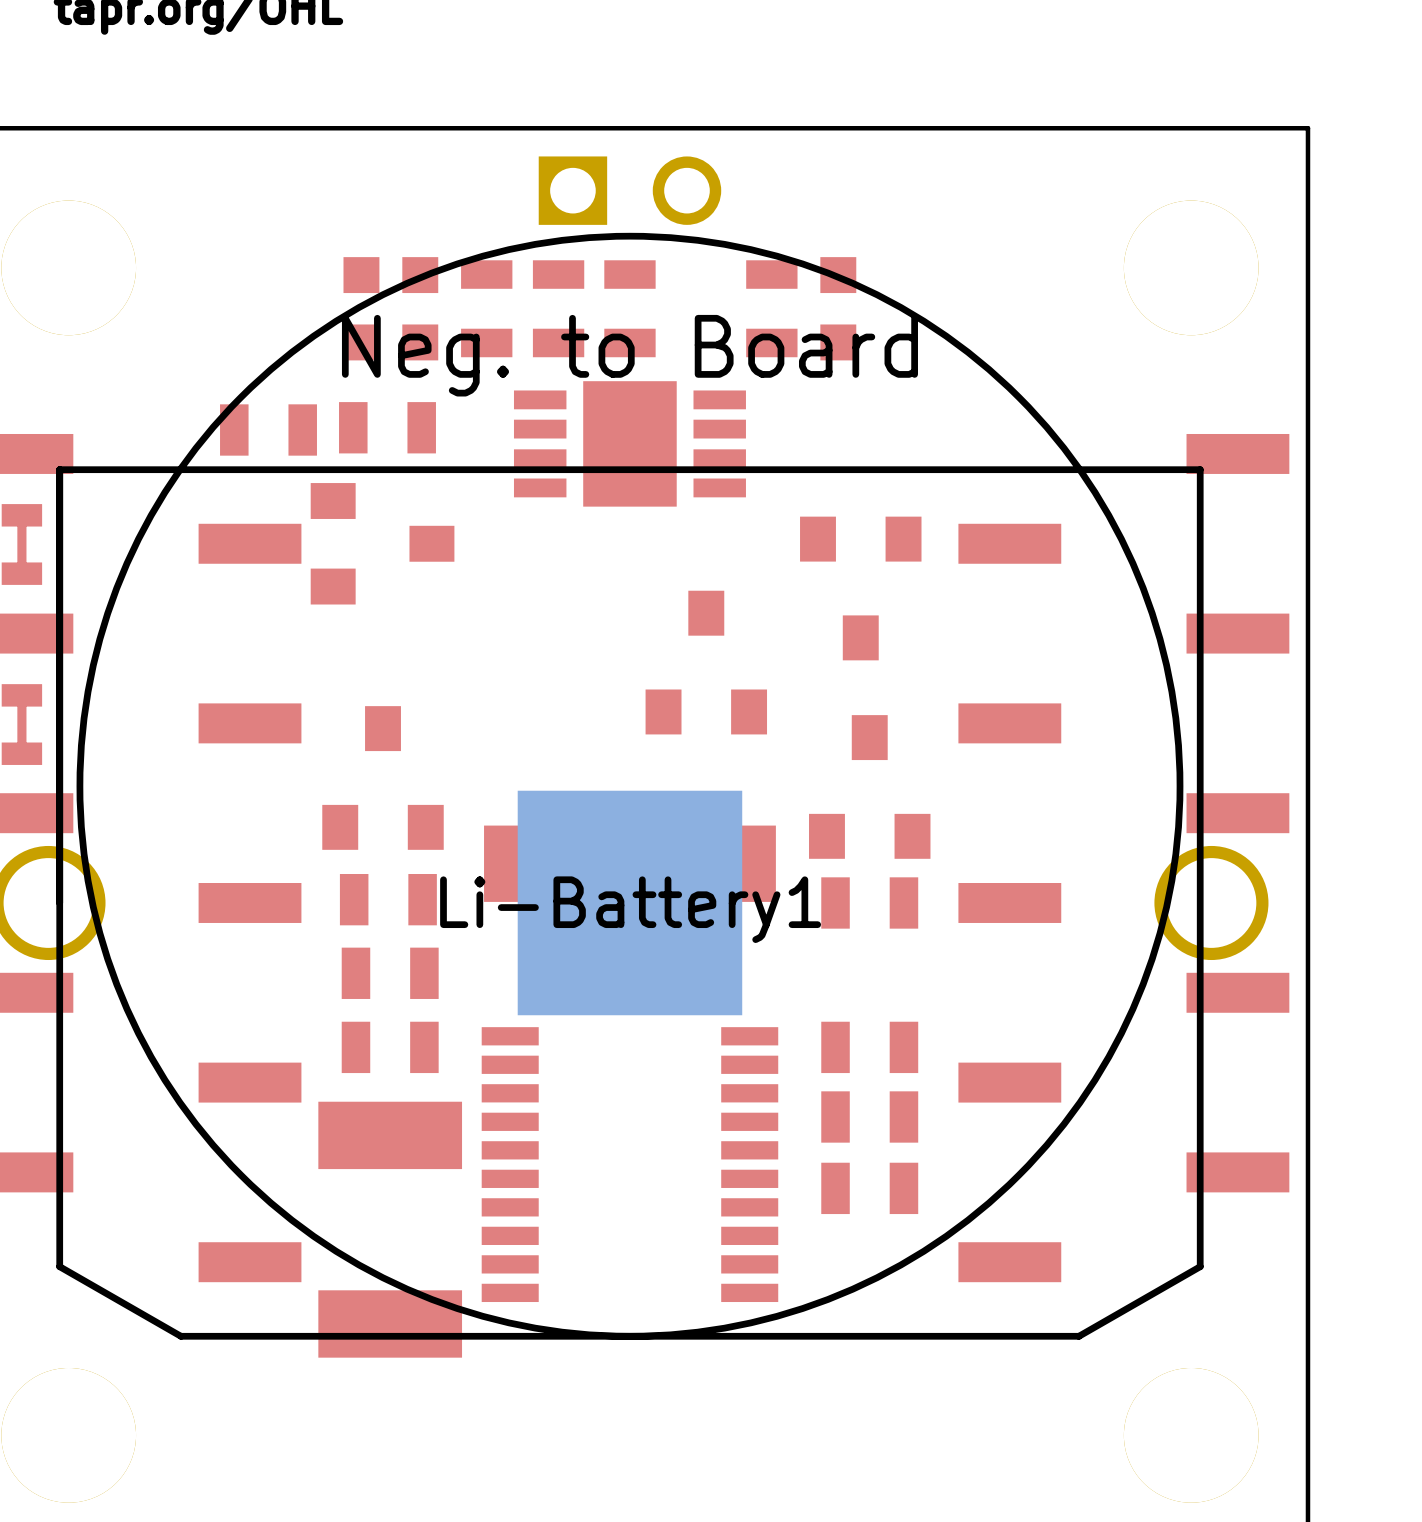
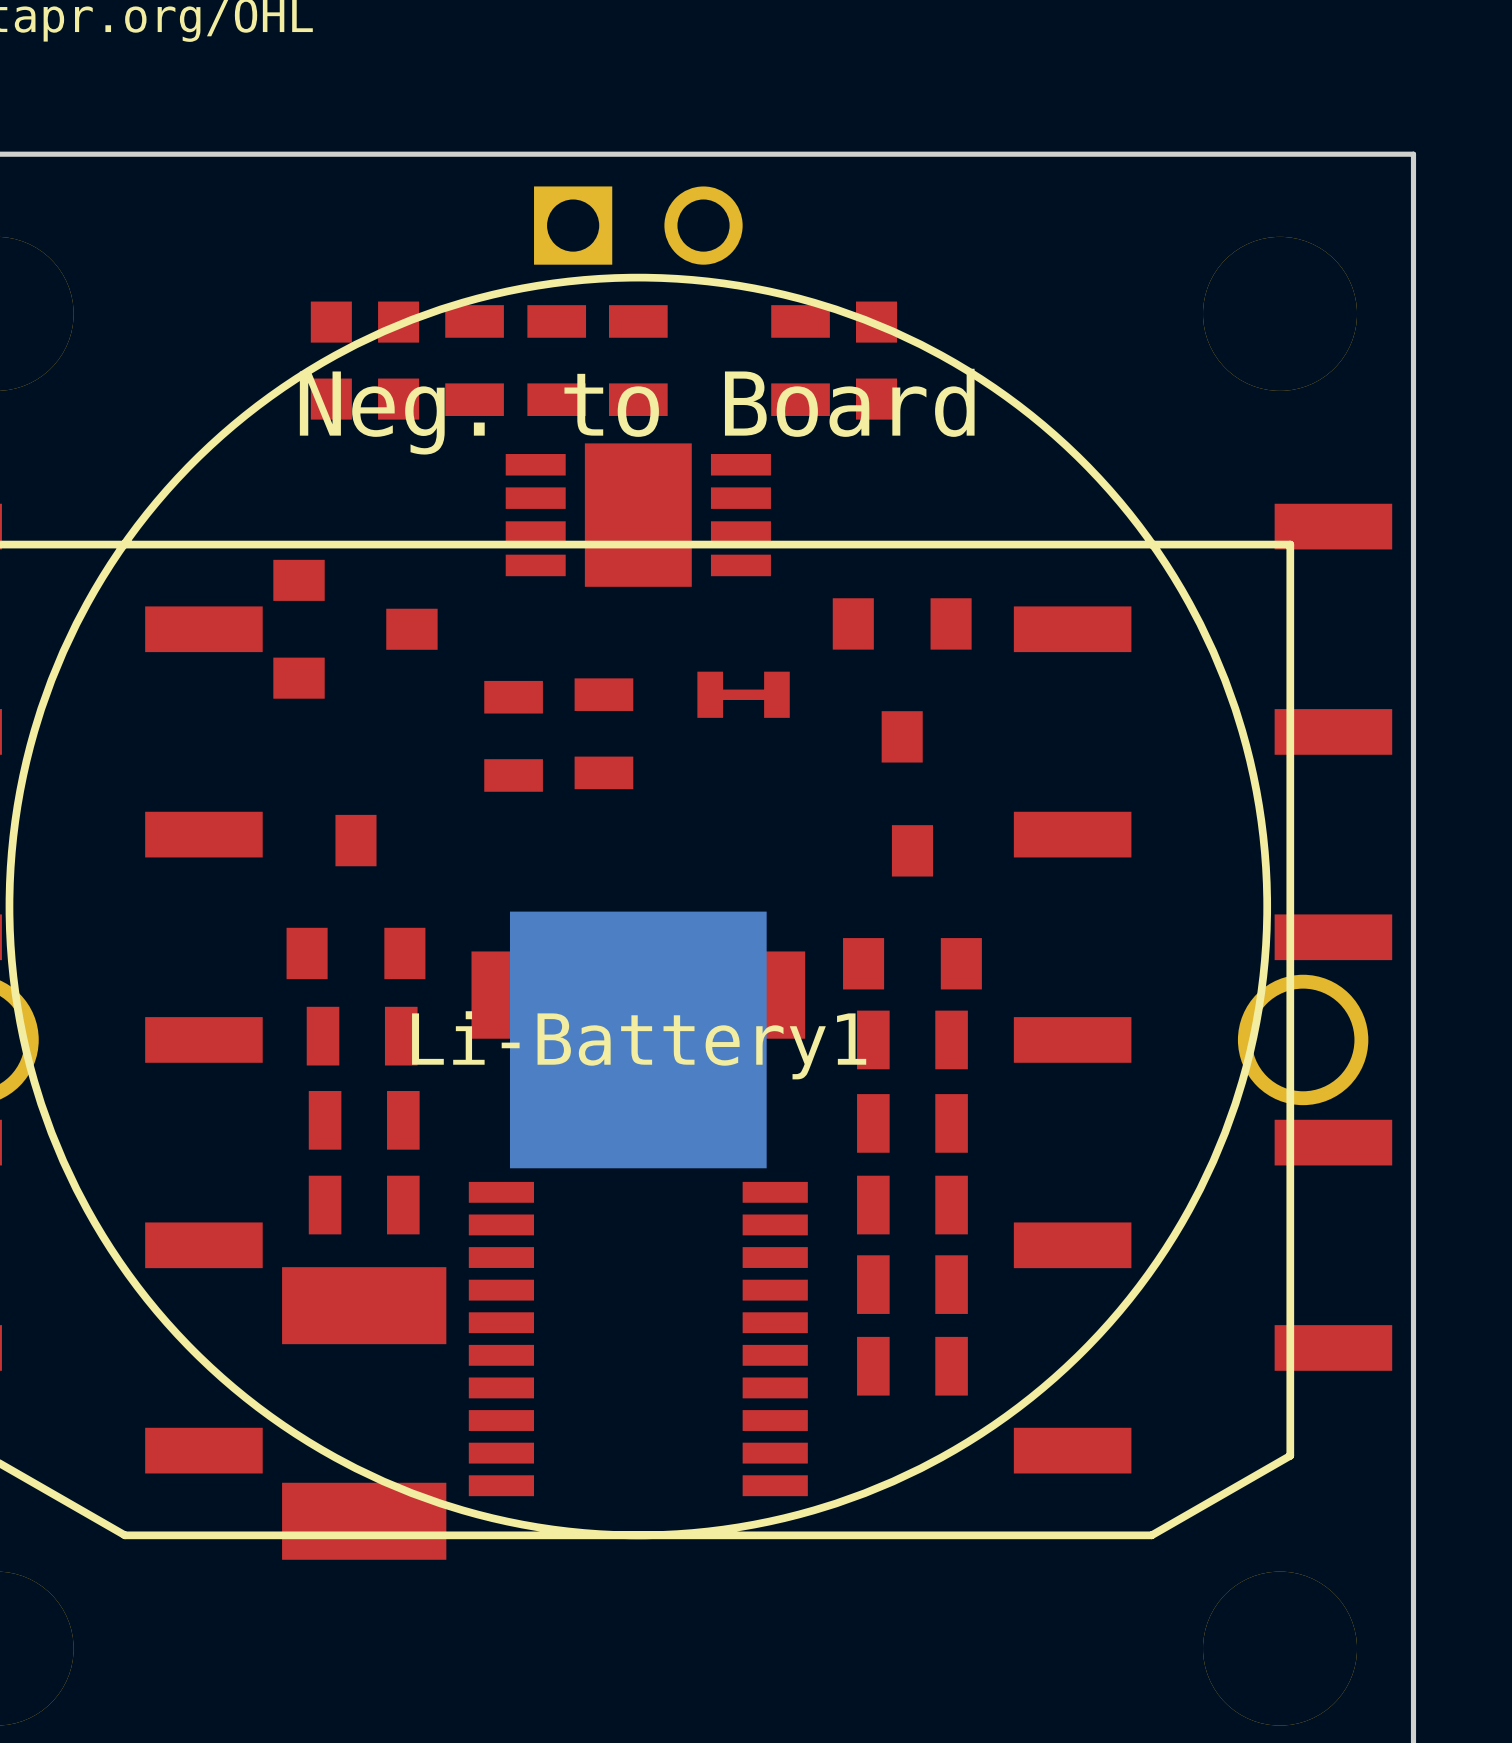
part: (387, 427) -> none
part: (268, 429) -> none
part: none -> (743, 694)
part: none -> (603, 733)
part: none -> (513, 736)
part: (706, 662) -> none
part: none -> (912, 1123)

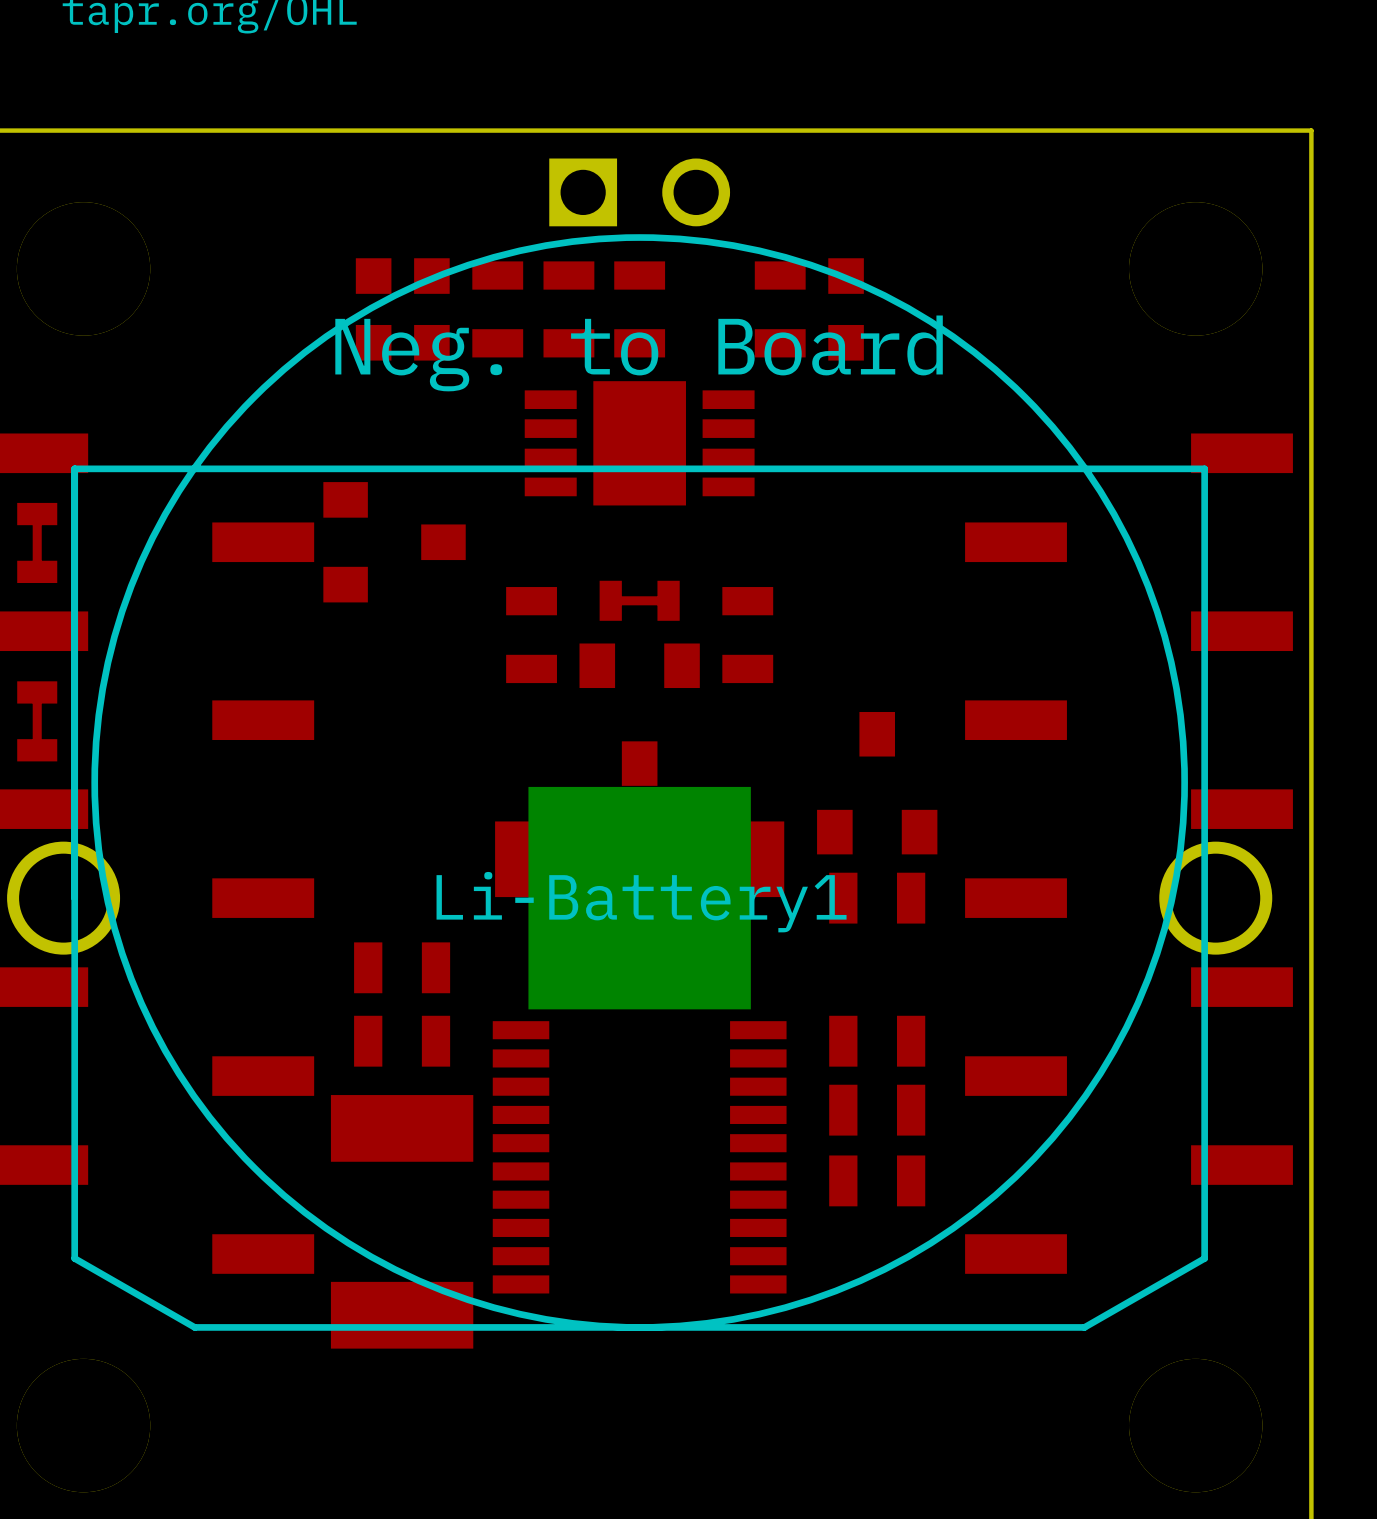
part footprint: [697, 671, 790, 718] -> [722, 587, 774, 684]
part: (902, 680) -> none
part: none -> (639, 600)
part: (603, 733) -> none
part: none -> (639, 714)
part: (355, 897) -> none
part: (362, 1036) -> none
part: (912, 1123) -> none

